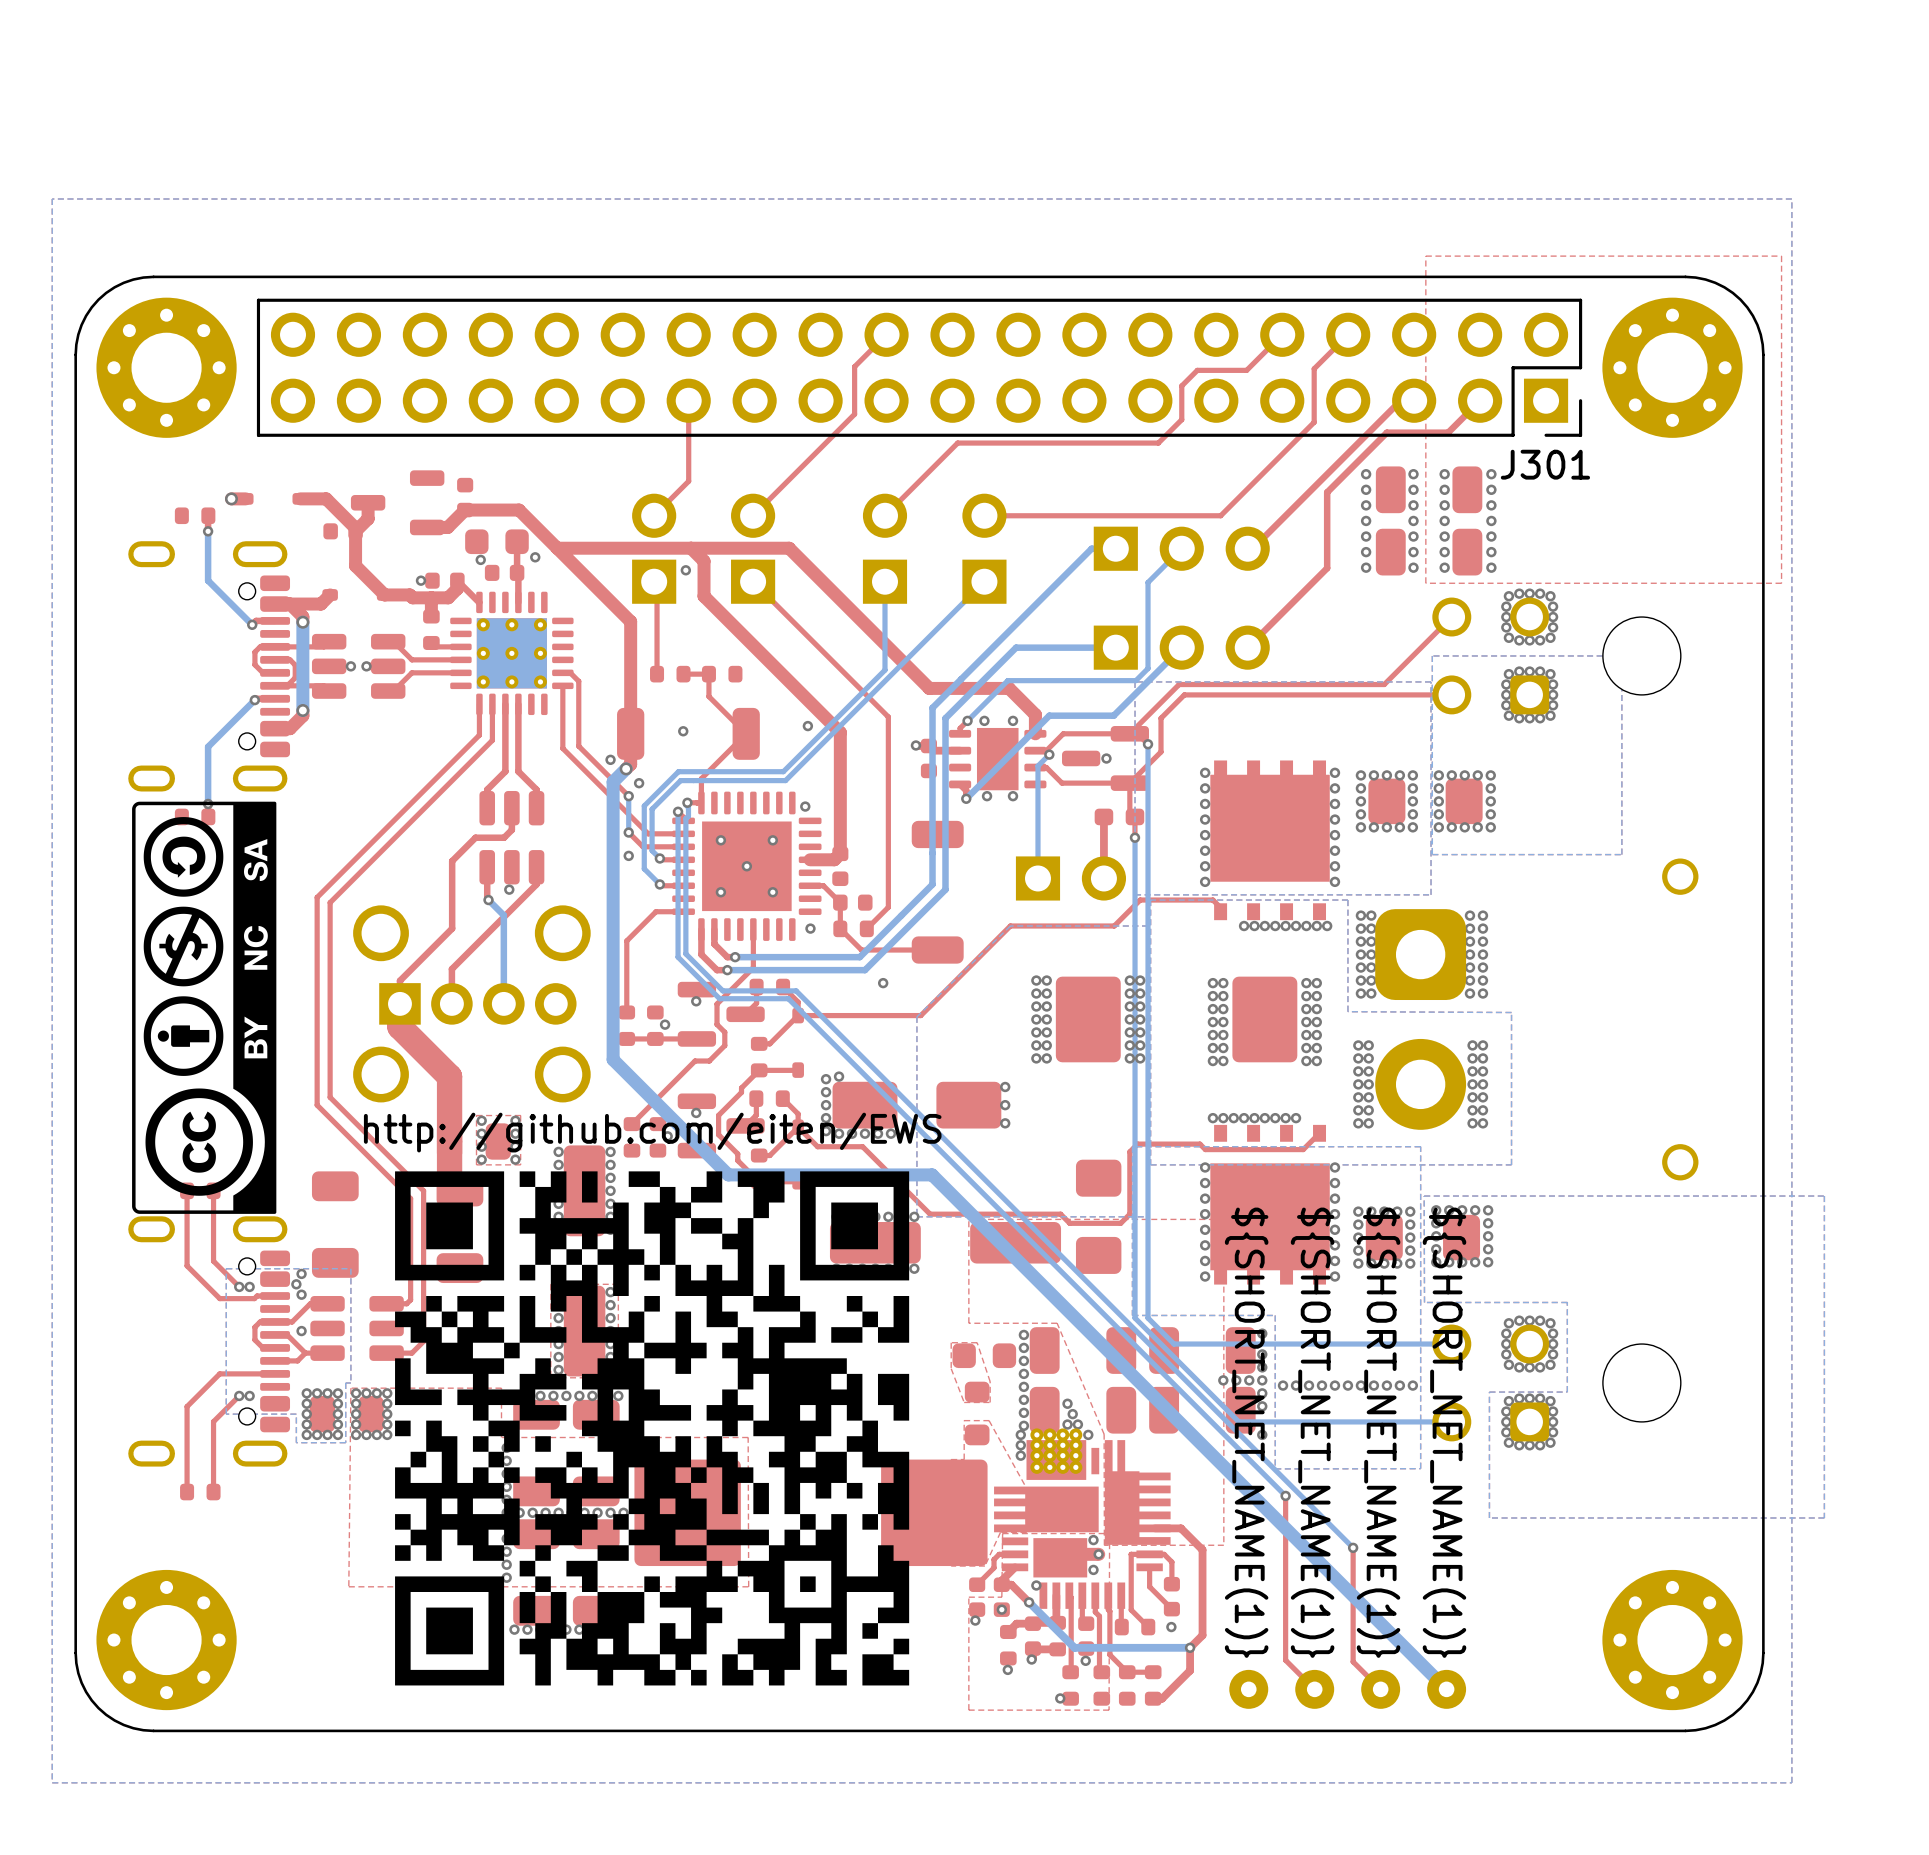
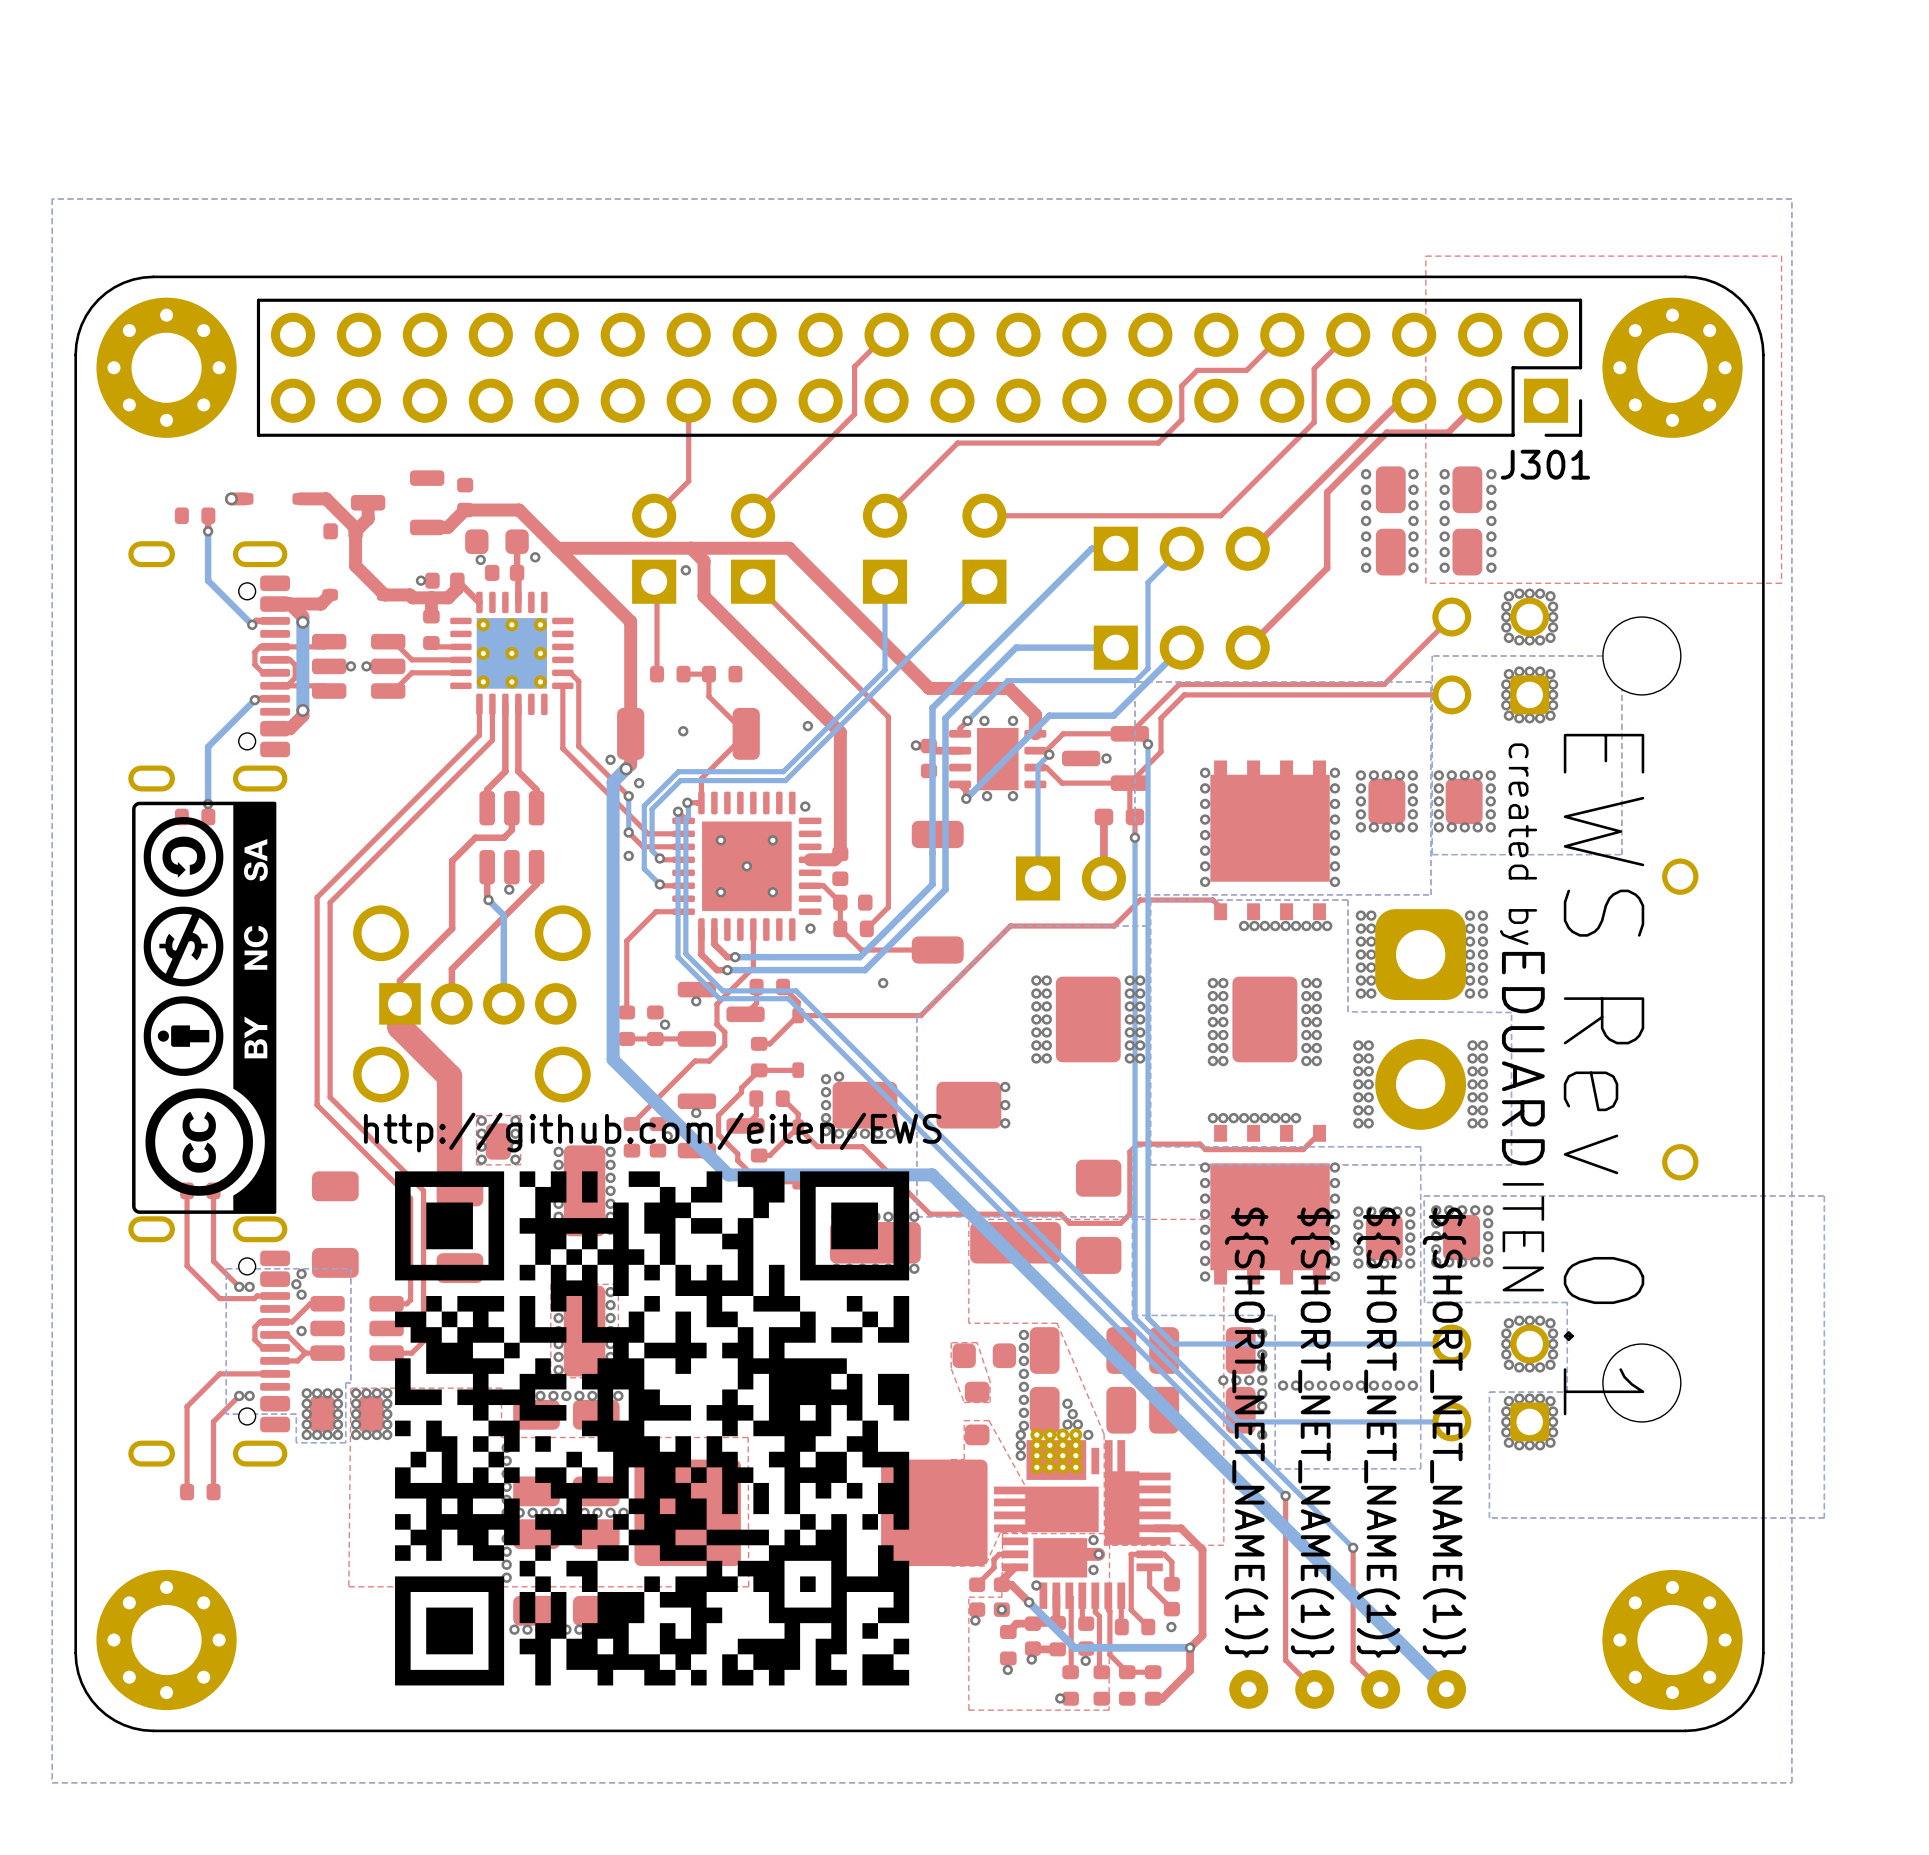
drawing: none -> [1499, 733, 1645, 1416]

